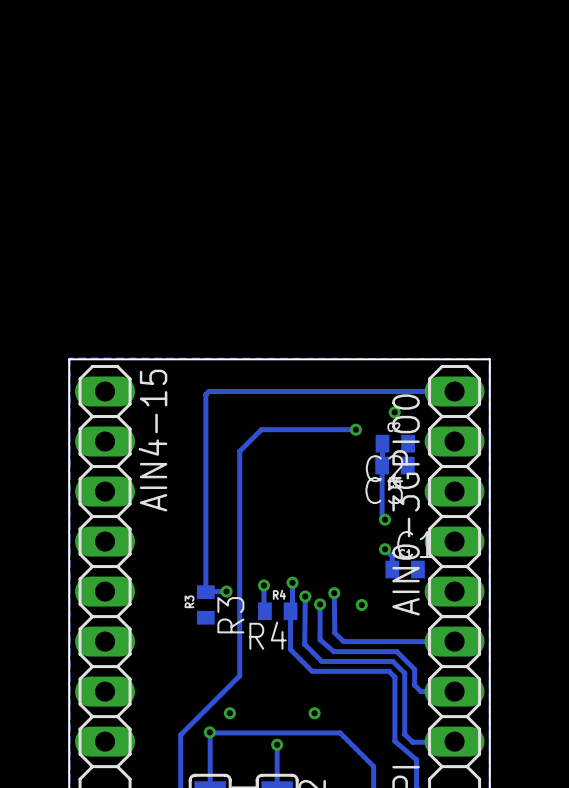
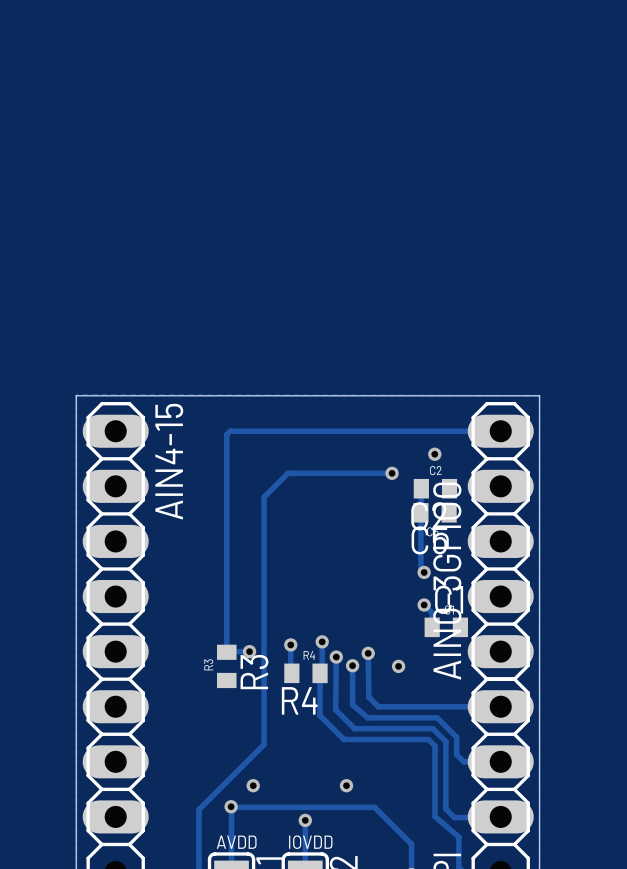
text: none -> AVDD (236, 842)
text: none -> IOVDD (310, 842)

